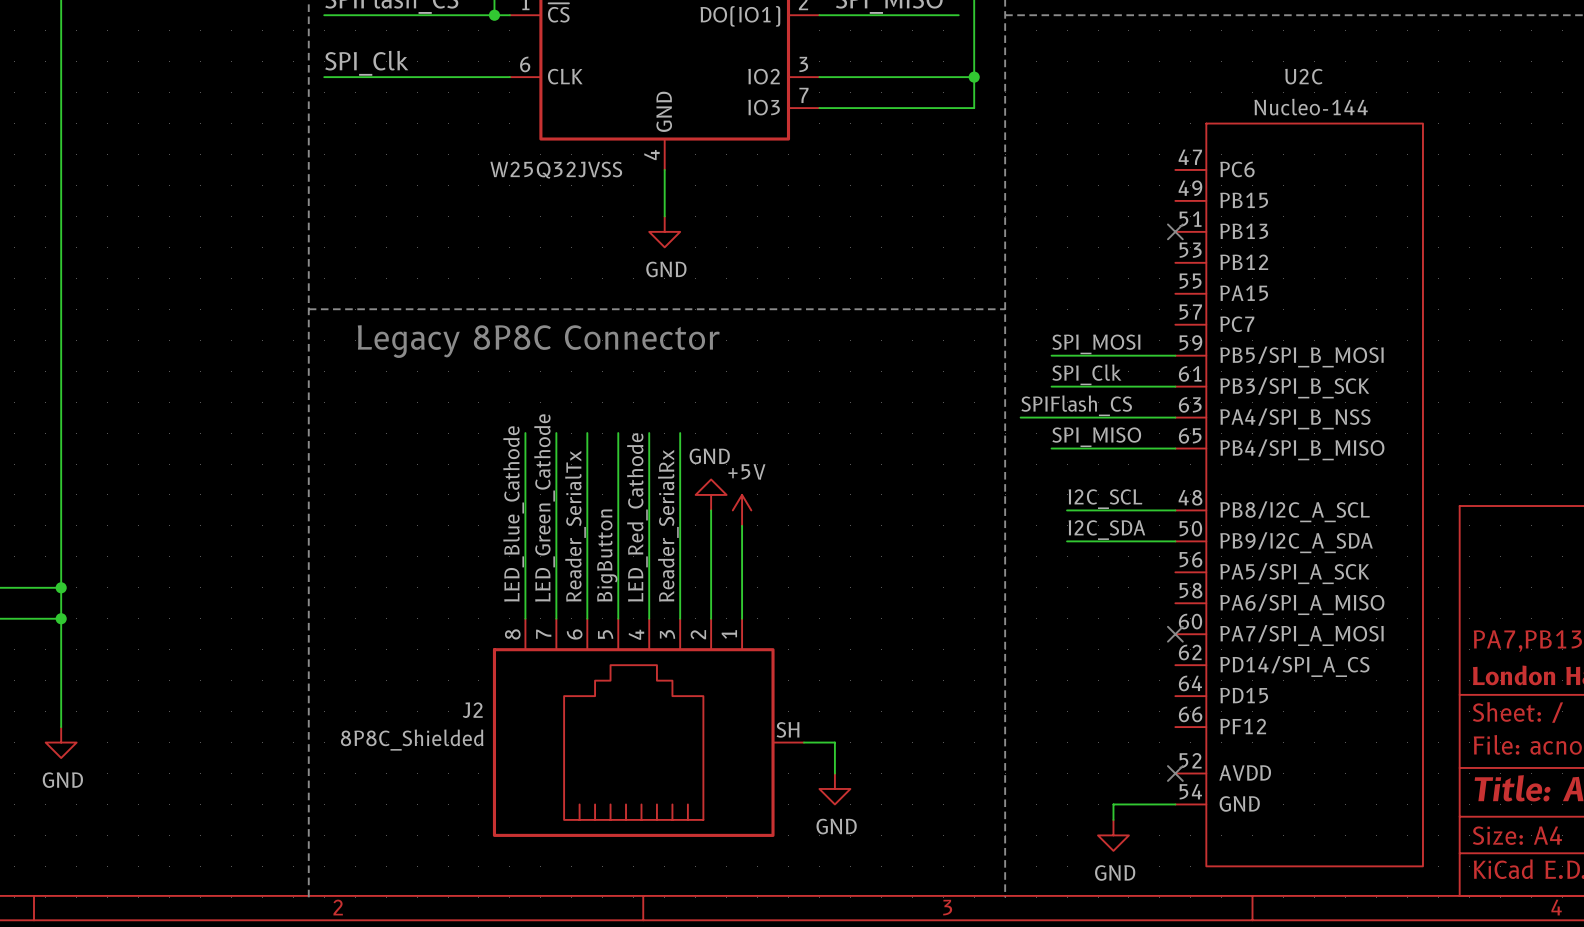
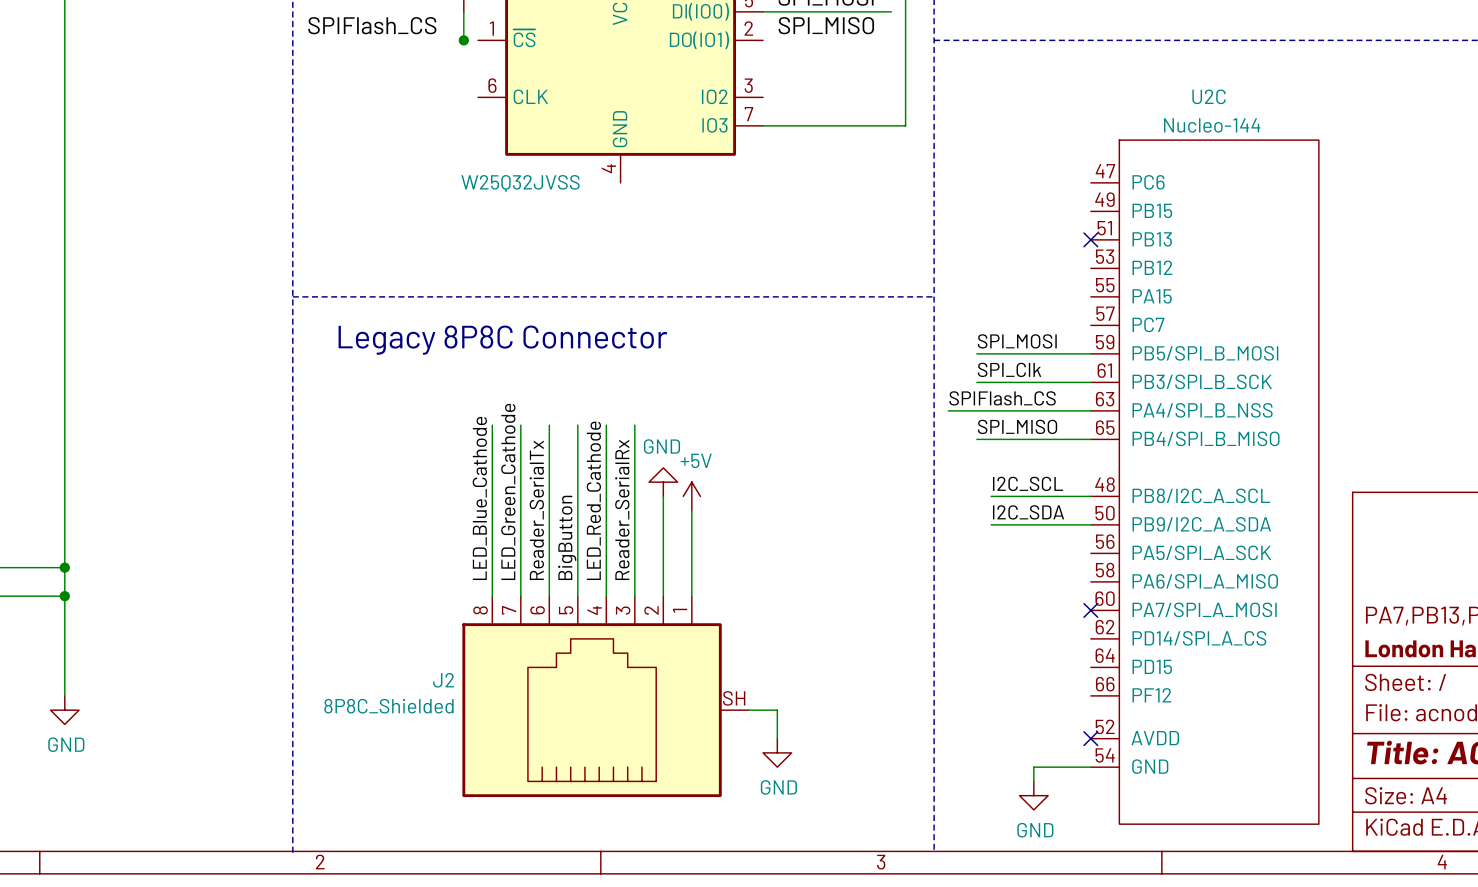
wire: (324, 15) (509, 15) -> none
wire: (819, 15) (958, 15) -> none
label: SPI_Clk (366, 63) -> none
wire: (324, 77) (509, 77) -> none
wire: (819, 77) (974, 77) -> none
junction: (974, 77) -> none
wire: (664, 169) (664, 216) -> none
power symbol: GND (664, 231) -> none
line: (308, 309) (1005, 309) -> (292, 296) (934, 296)

